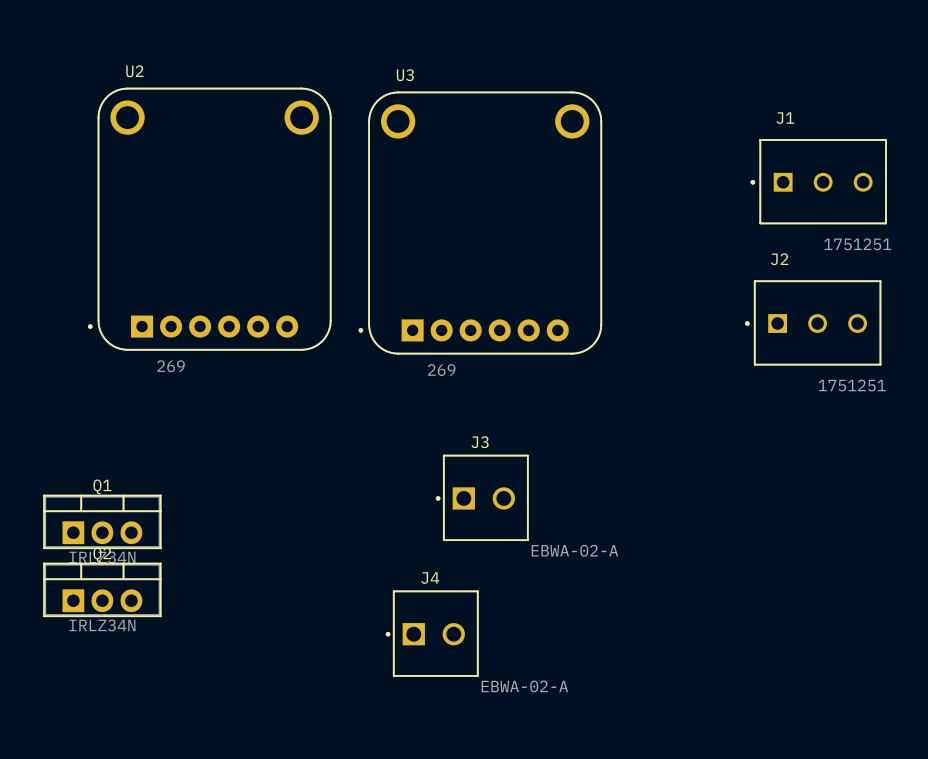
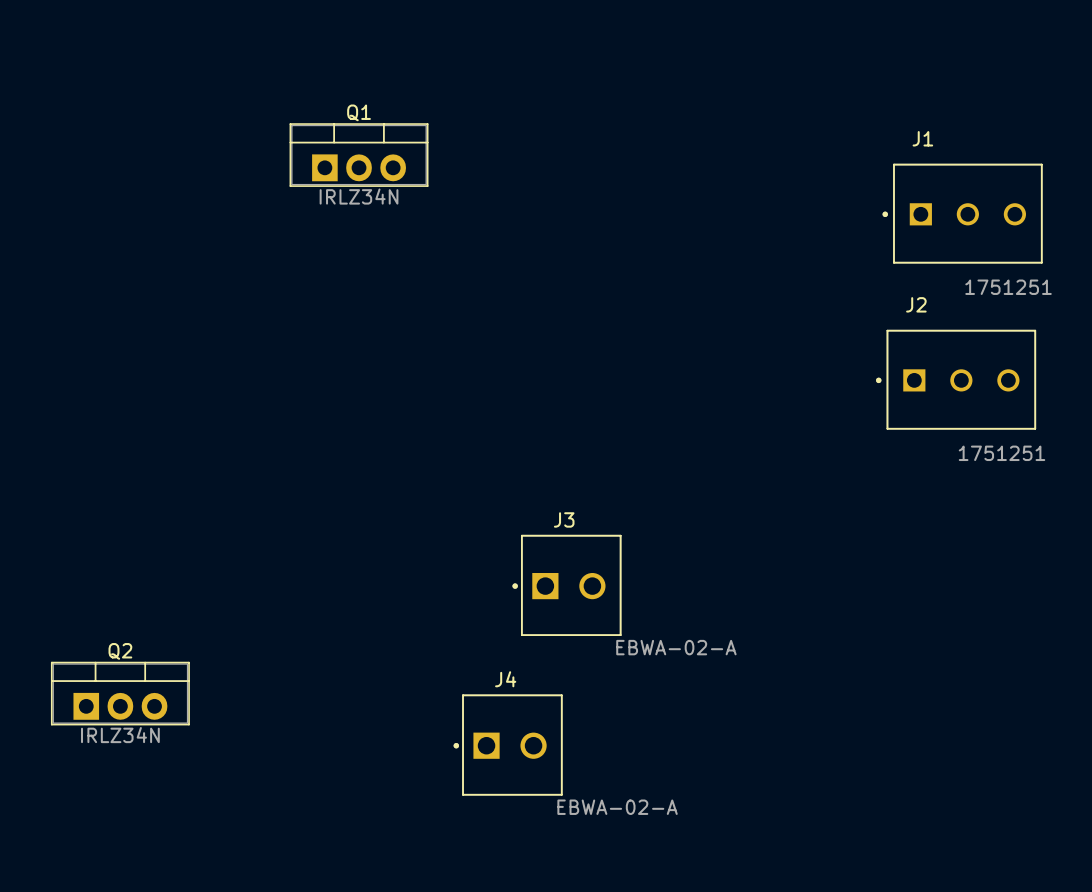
U2: 269 (209, 219) -> none
U3: 269 (480, 223) -> none
Q1 position: (102, 521) -> (359, 155)

